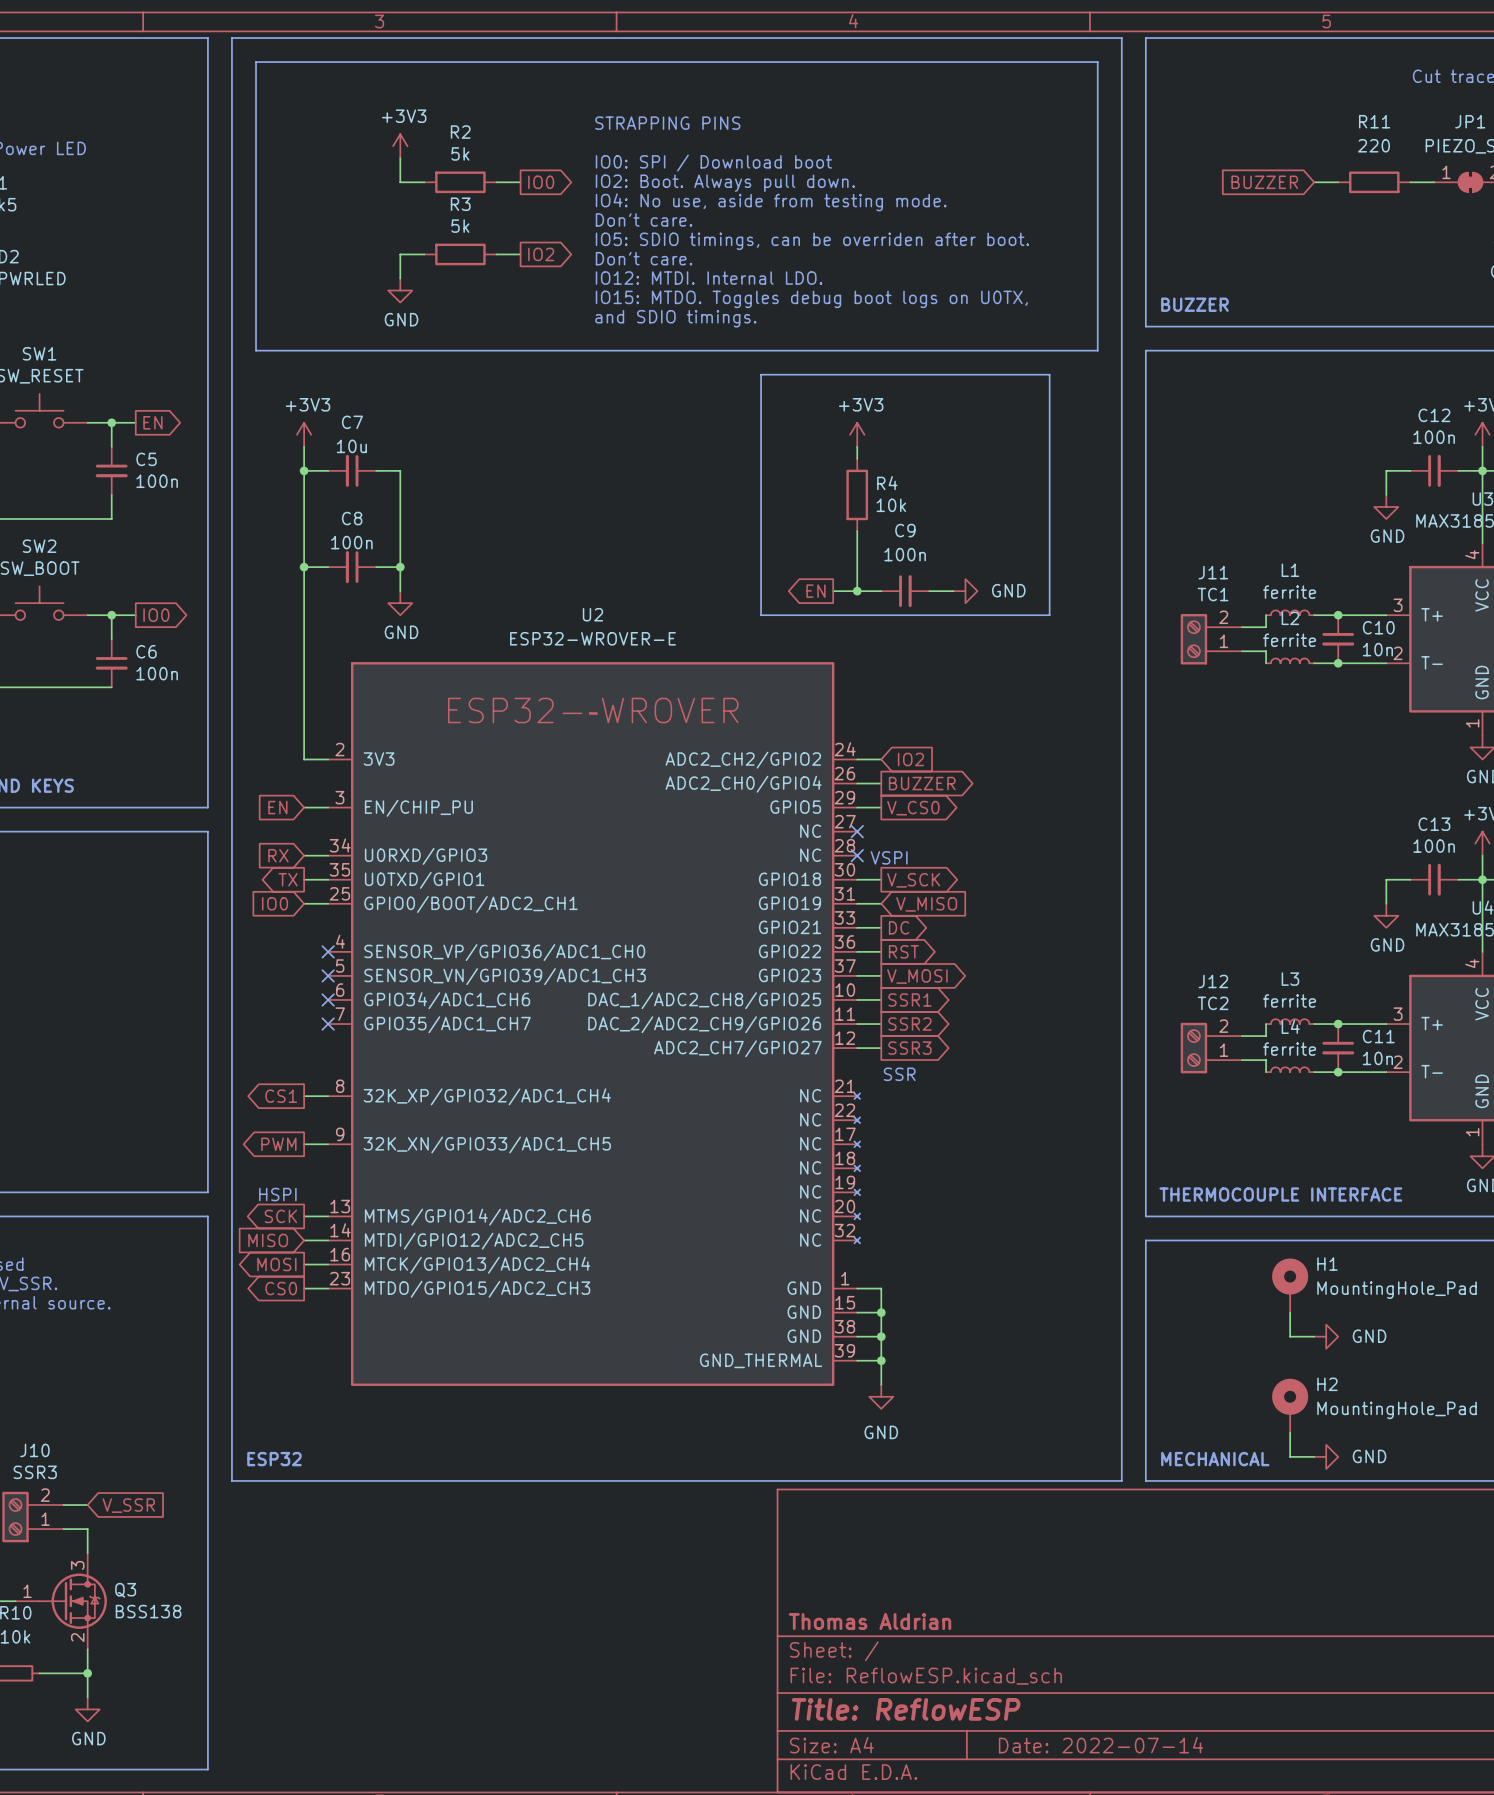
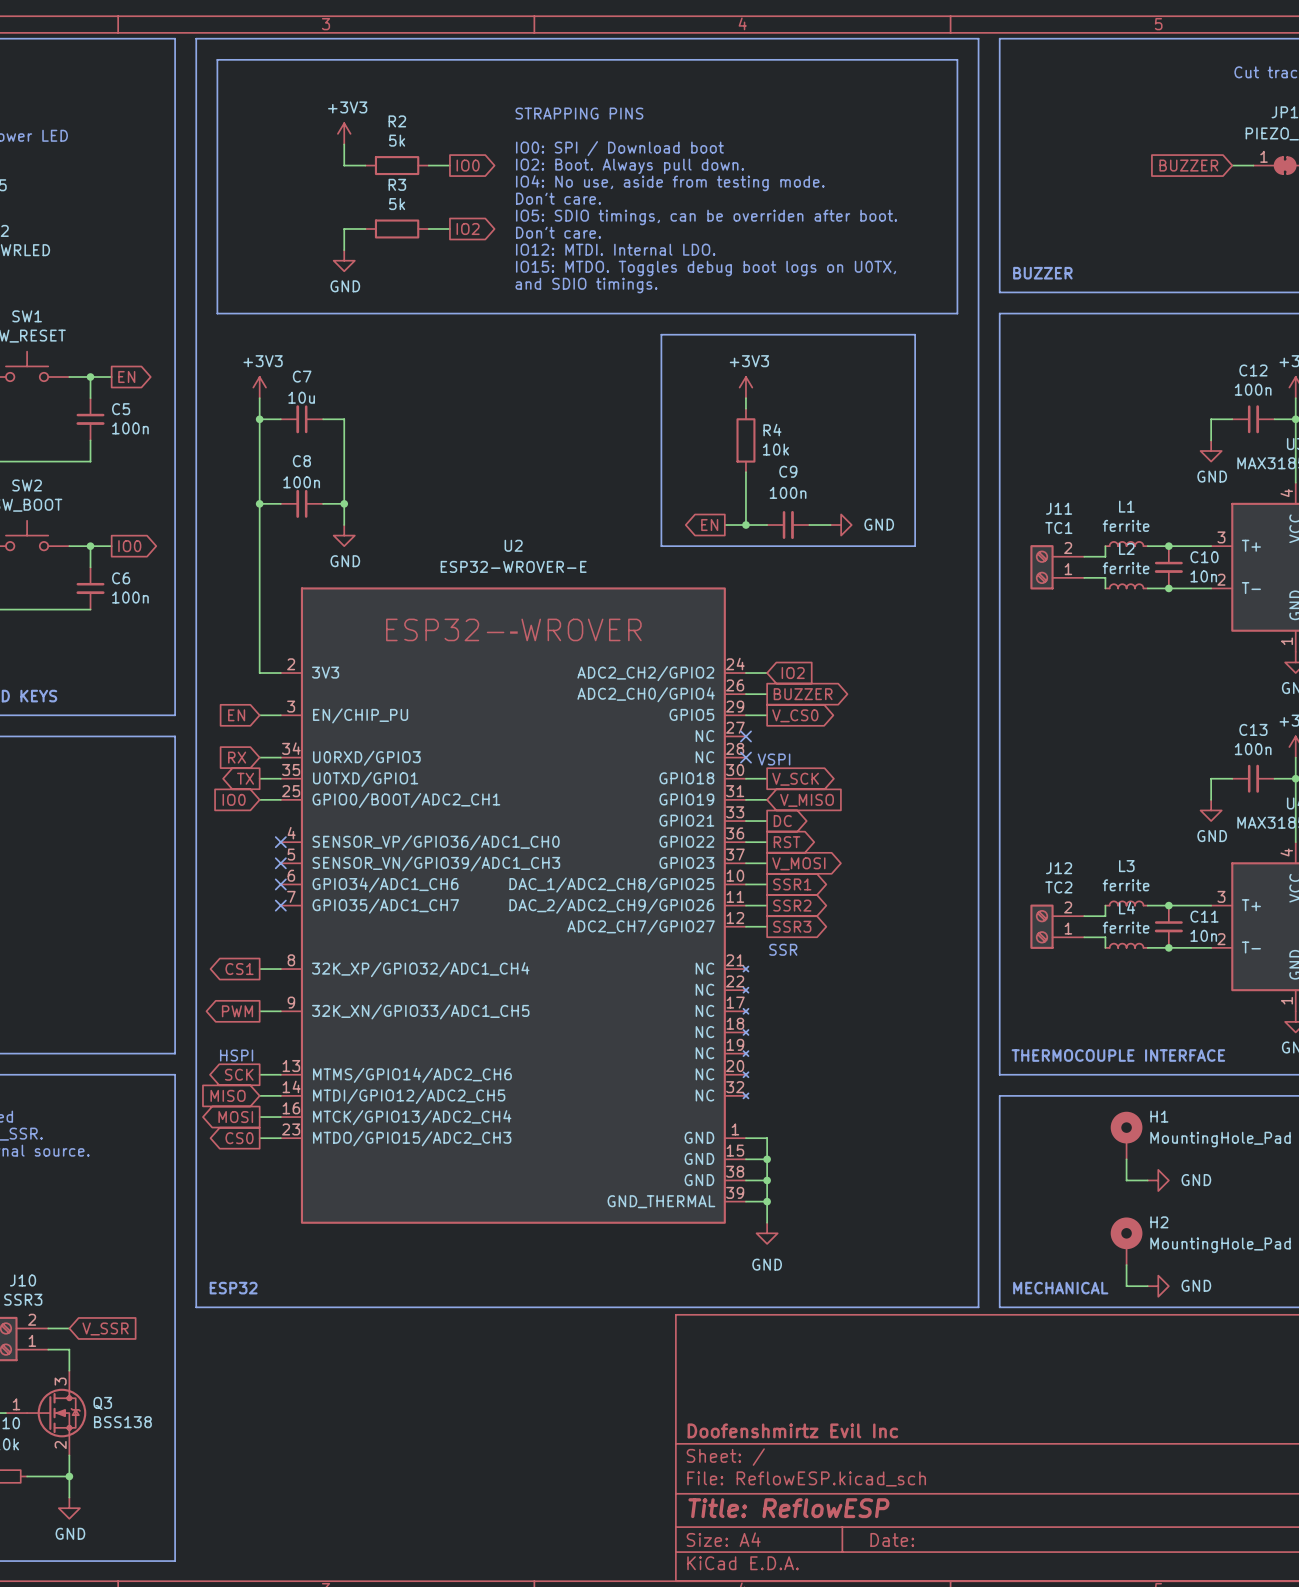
global label position: BUZZER (1264, 182) -> BUZZER (1188, 165)
wire: (1314, 182) (1338, 182) -> none
R11: 220 (1374, 182) -> none
title block: Thomas Aldrian (870, 1621) -> Doofenshmirtz Evil Inc (792, 1430)
title block: Date: 2022-07-14 (1101, 1745) -> Date: (892, 1539)

